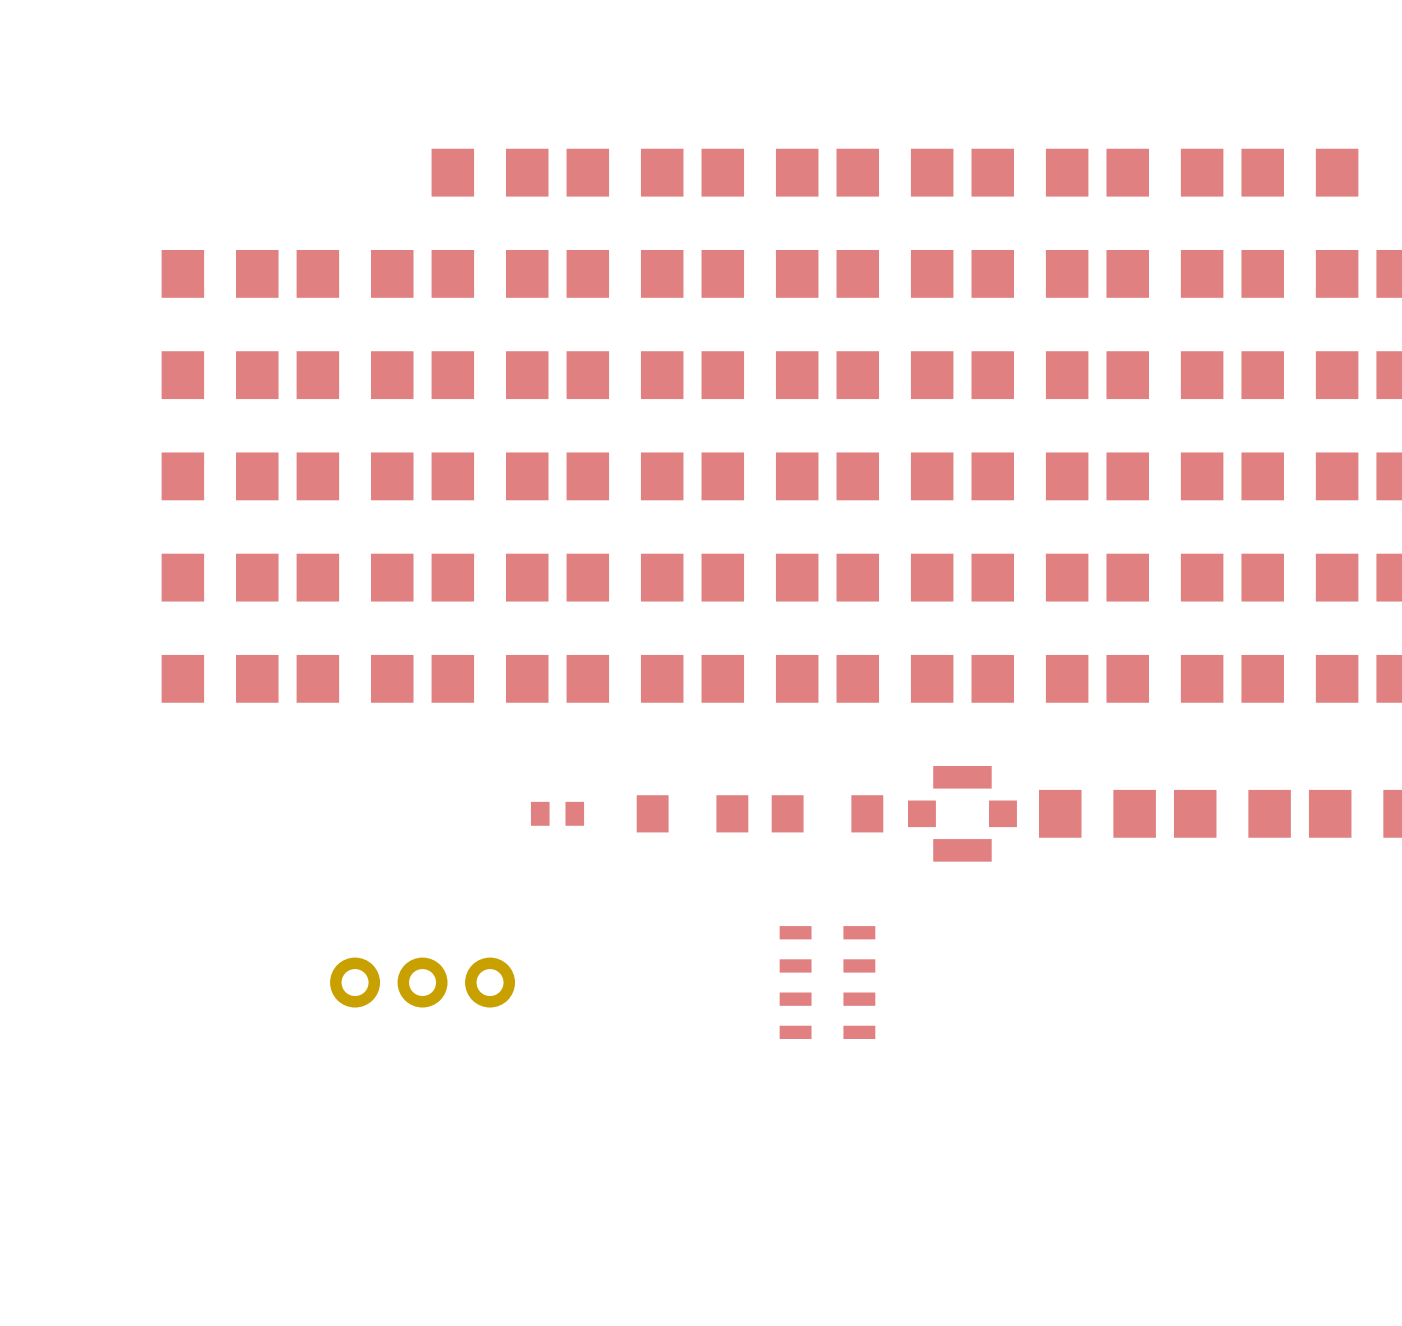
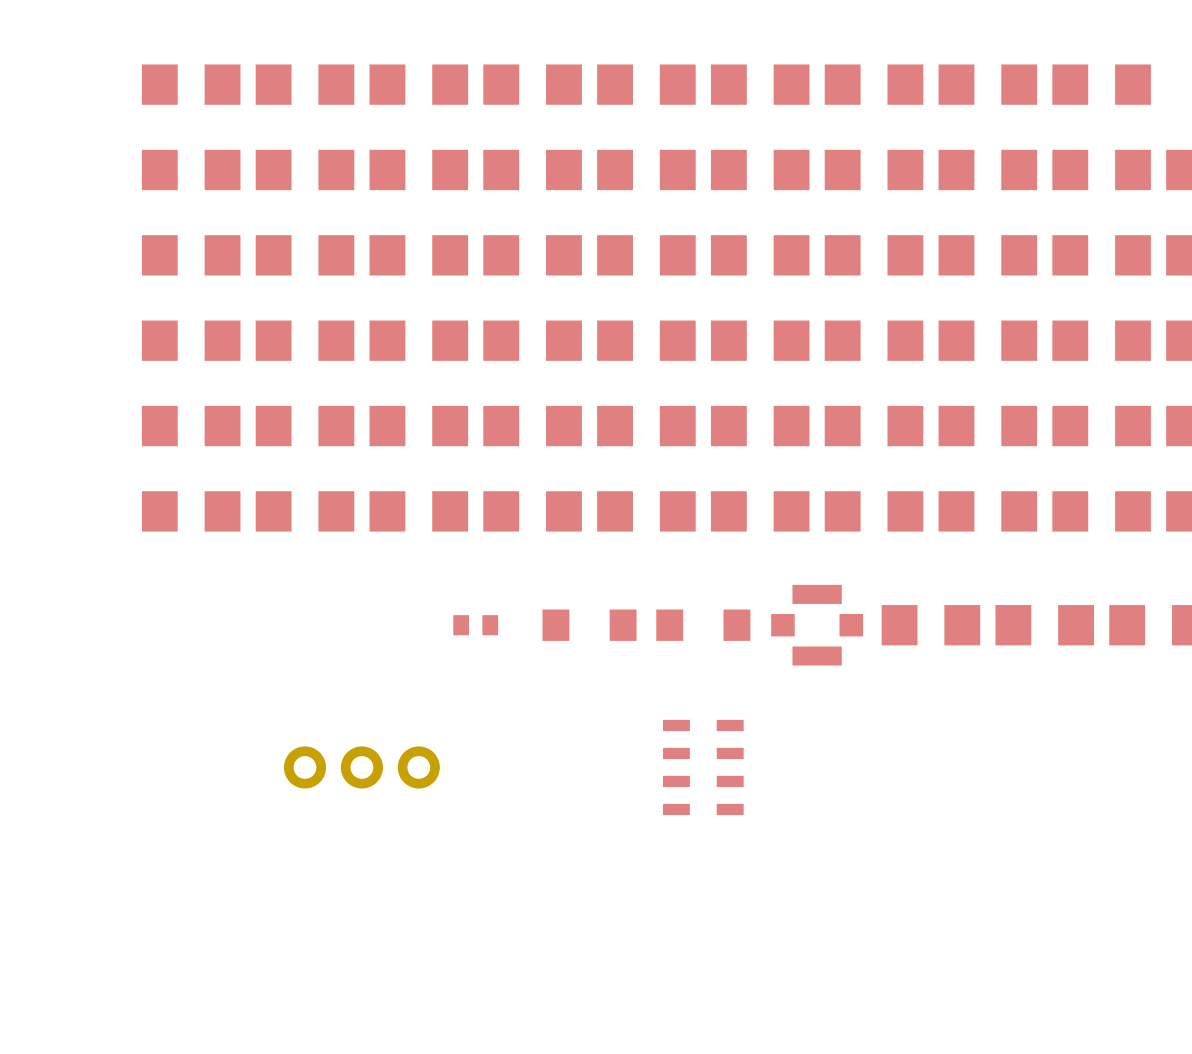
part: none -> (191, 84)
part: none -> (304, 84)

